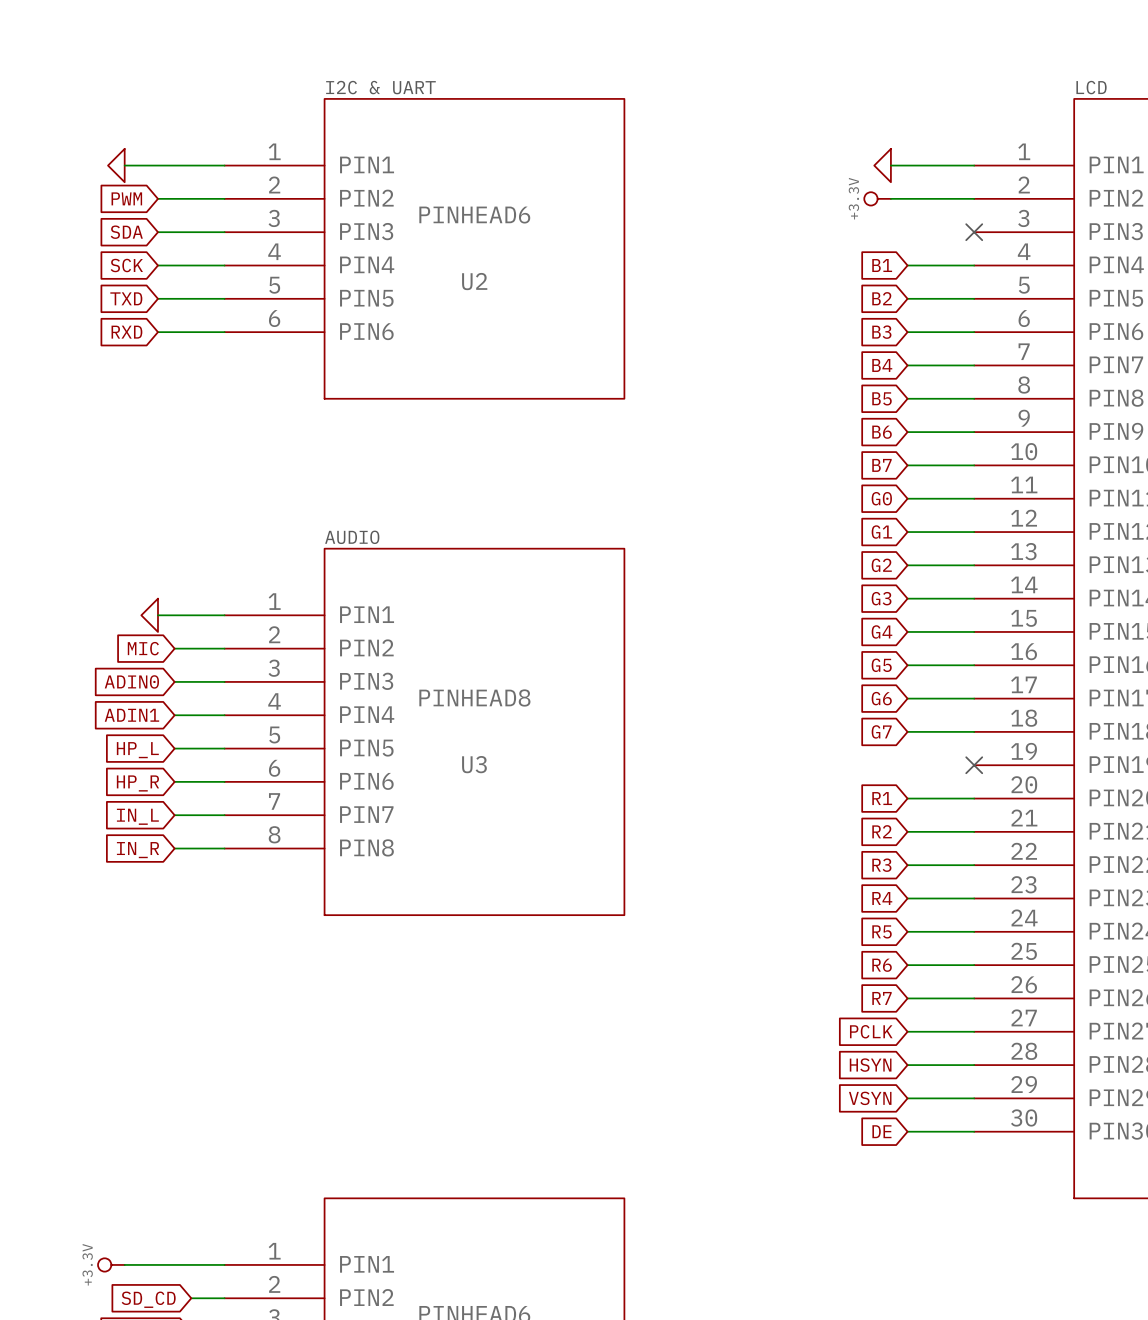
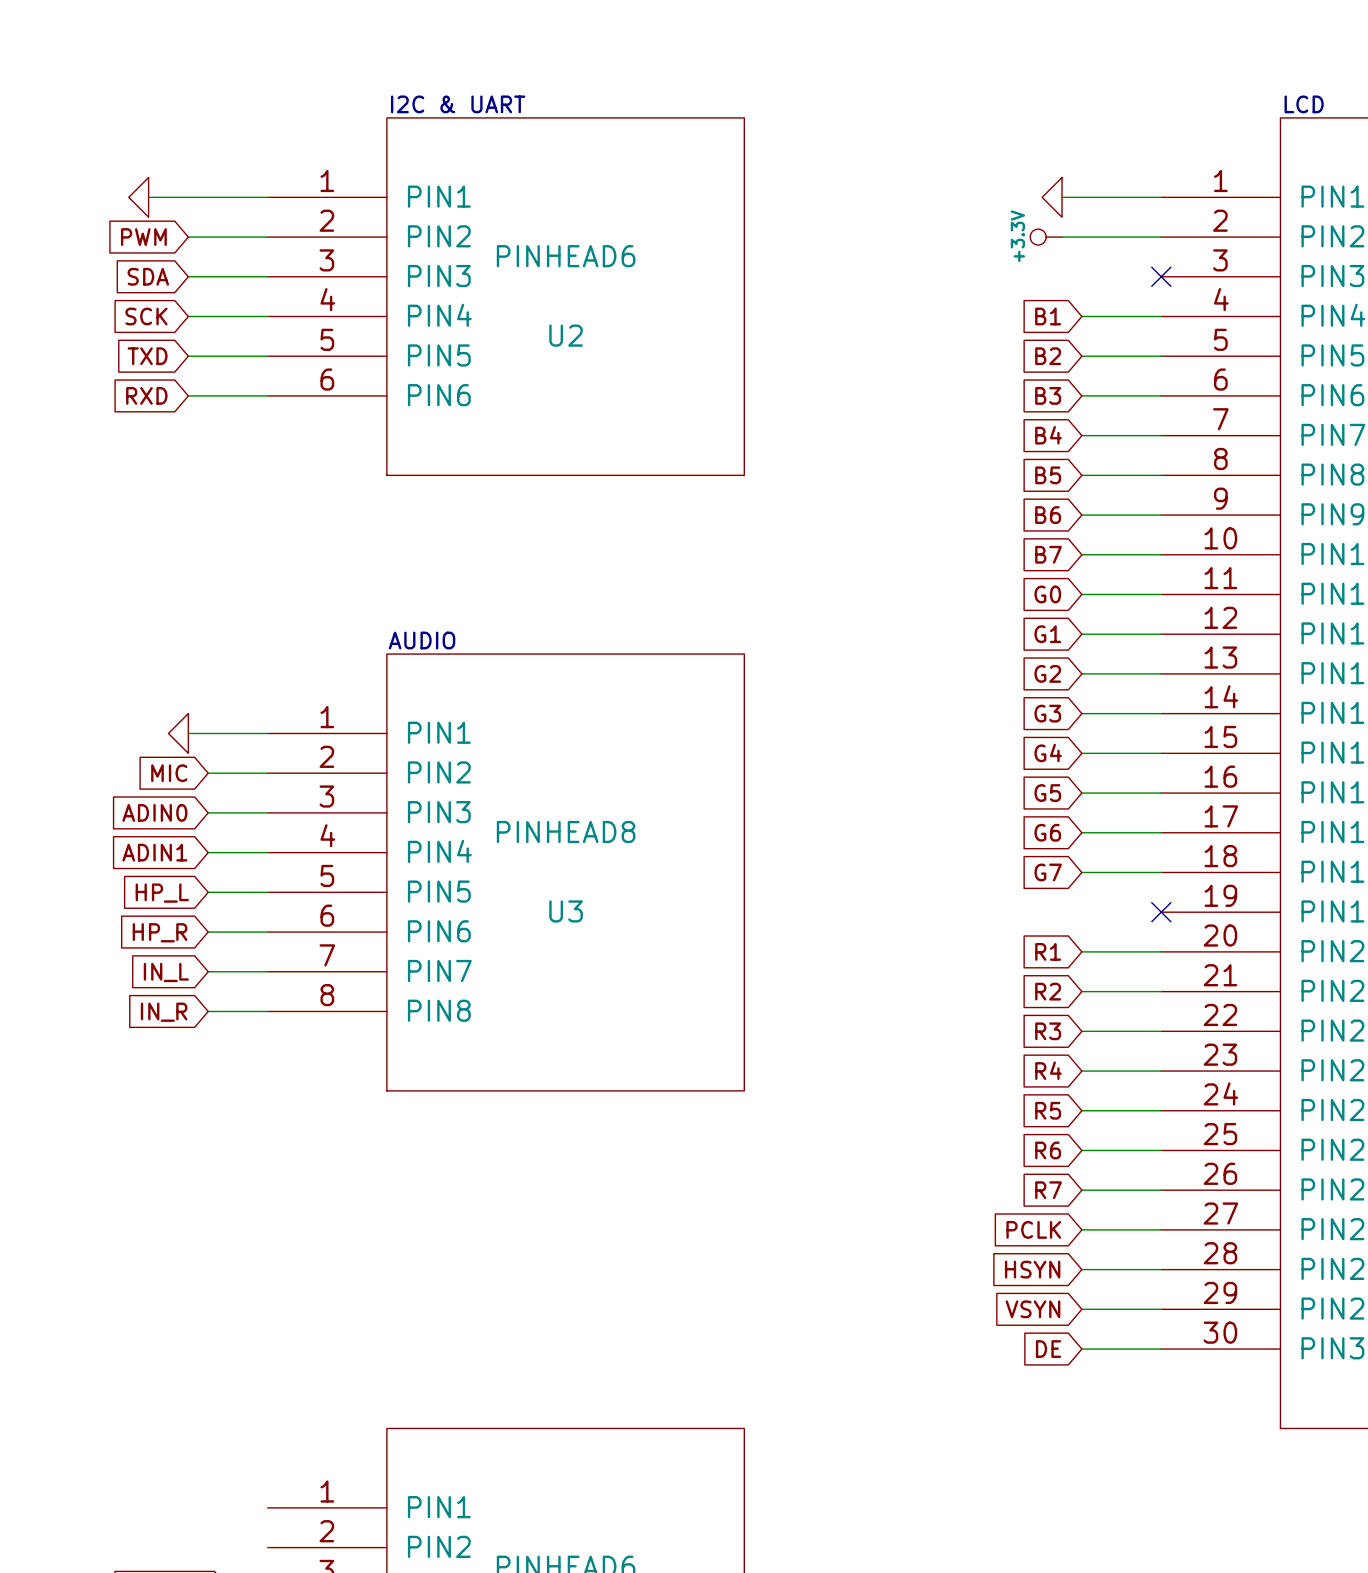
power symbol: +3.3V (111, 1264) -> none
wire: (124, 1264) (224, 1264) -> none
wire: (191, 1298) (224, 1298) -> none
global label: SD_CD (148, 1299) -> none

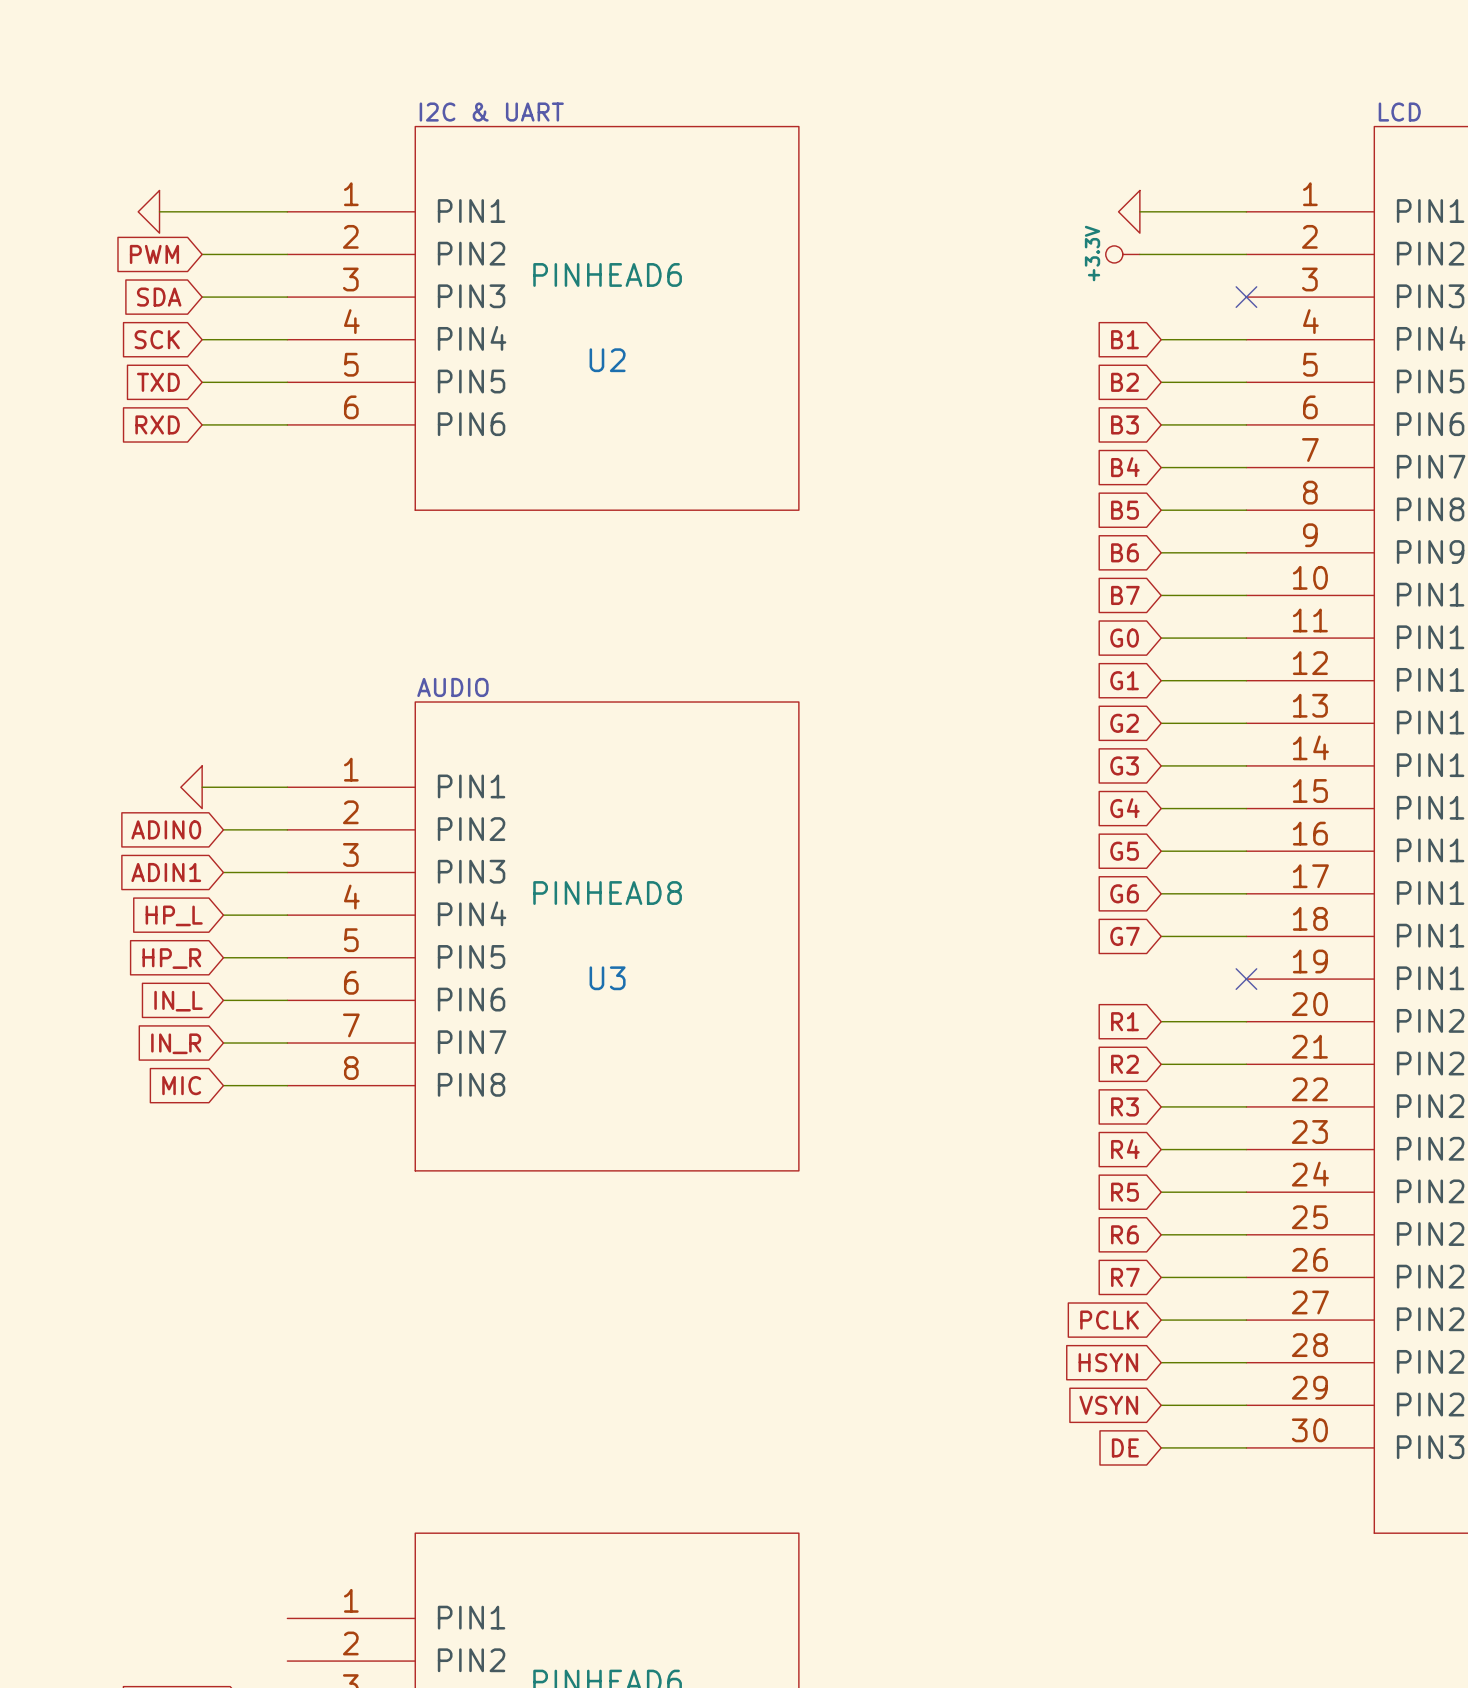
global label: MIC (169, 773) -> ADIN0 (166, 829)
global label: ADIN0 (154, 812) -> ADIN1 (166, 872)
global label: ADIN1 (154, 852) -> HP_L (174, 915)
global label: HP_L (162, 893) -> HP_R (171, 958)
global label: HP_R (160, 932) -> IN_L (178, 1001)
global label: IN_L (166, 972) -> IN_R (176, 1043)
global label: IN_R (164, 1012) -> MIC (181, 1085)

